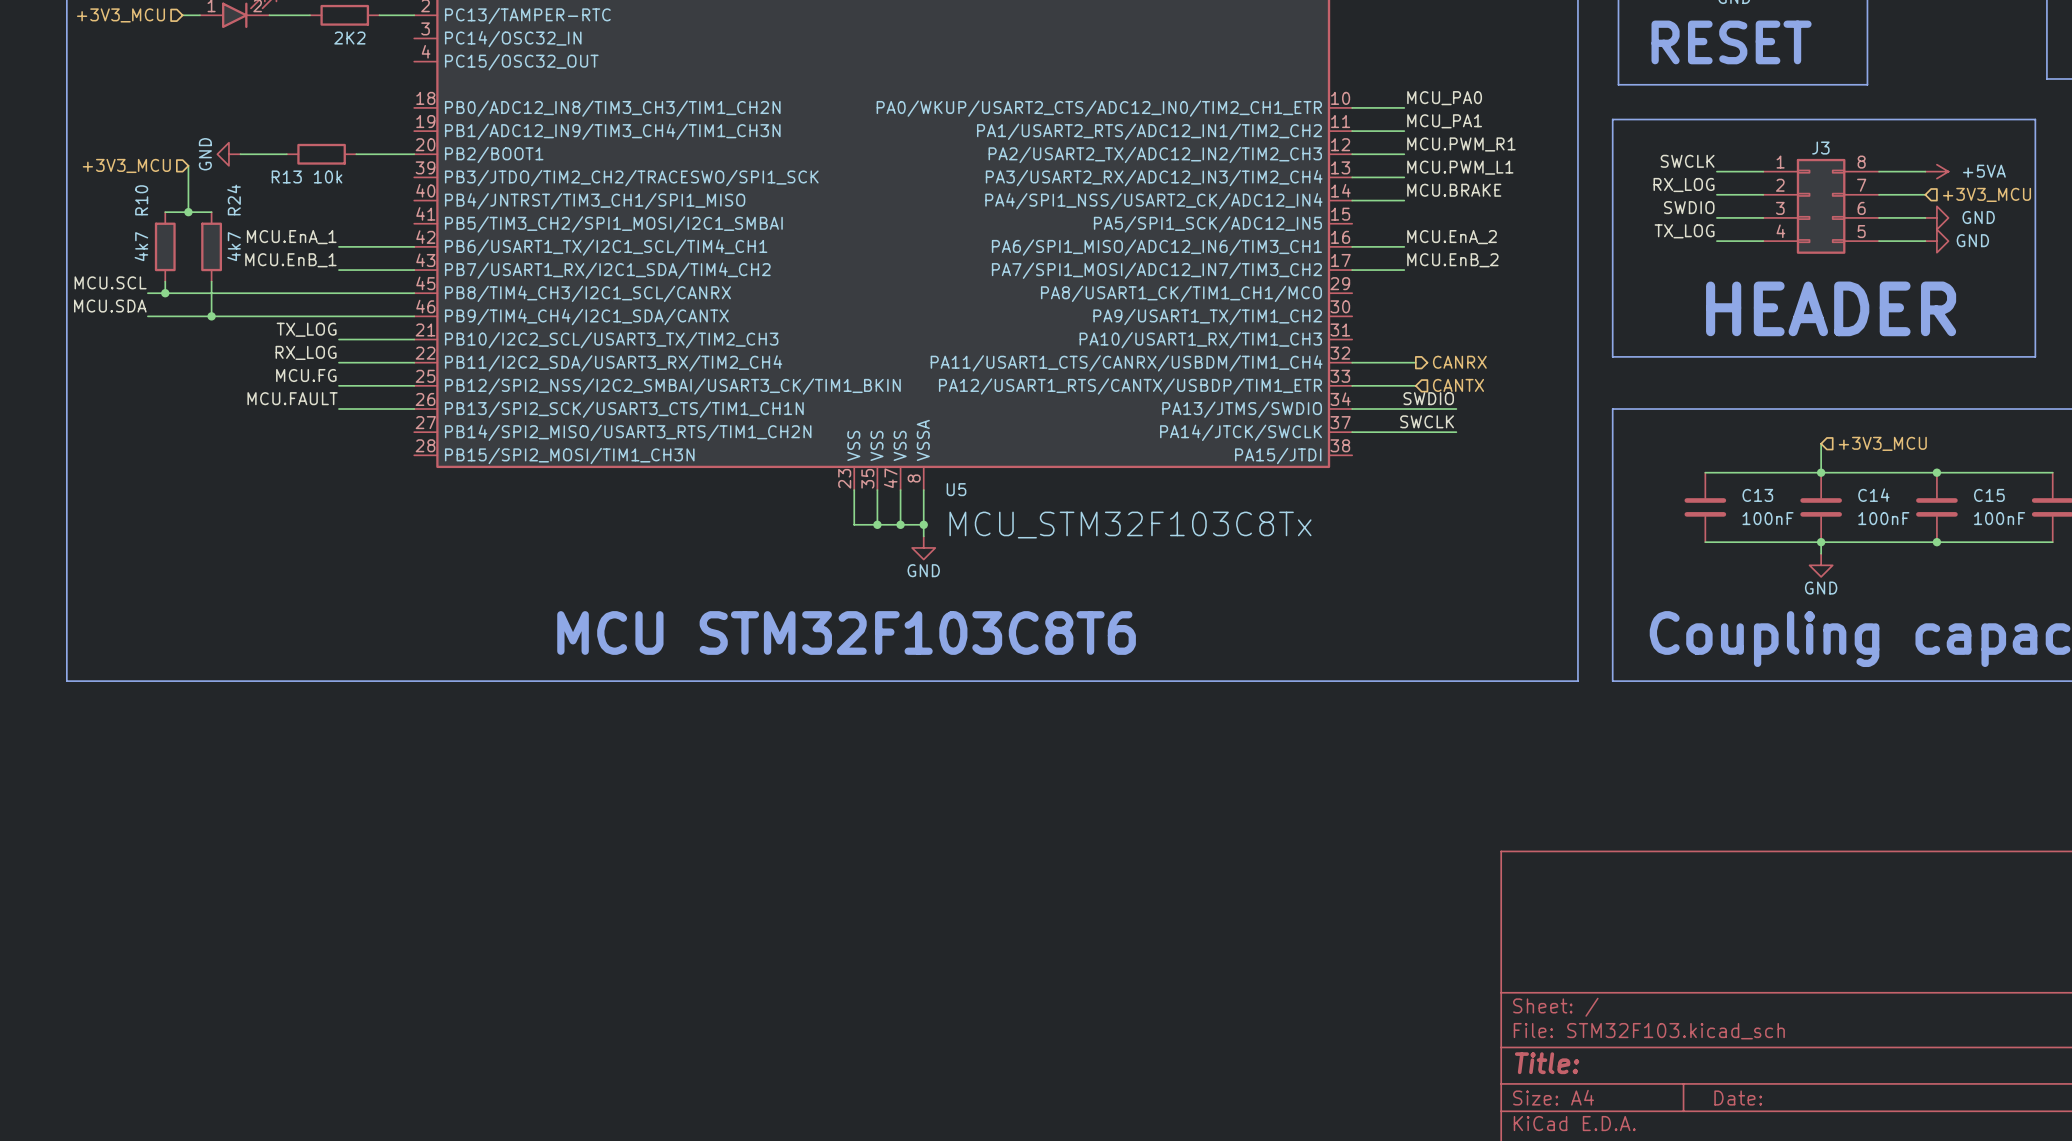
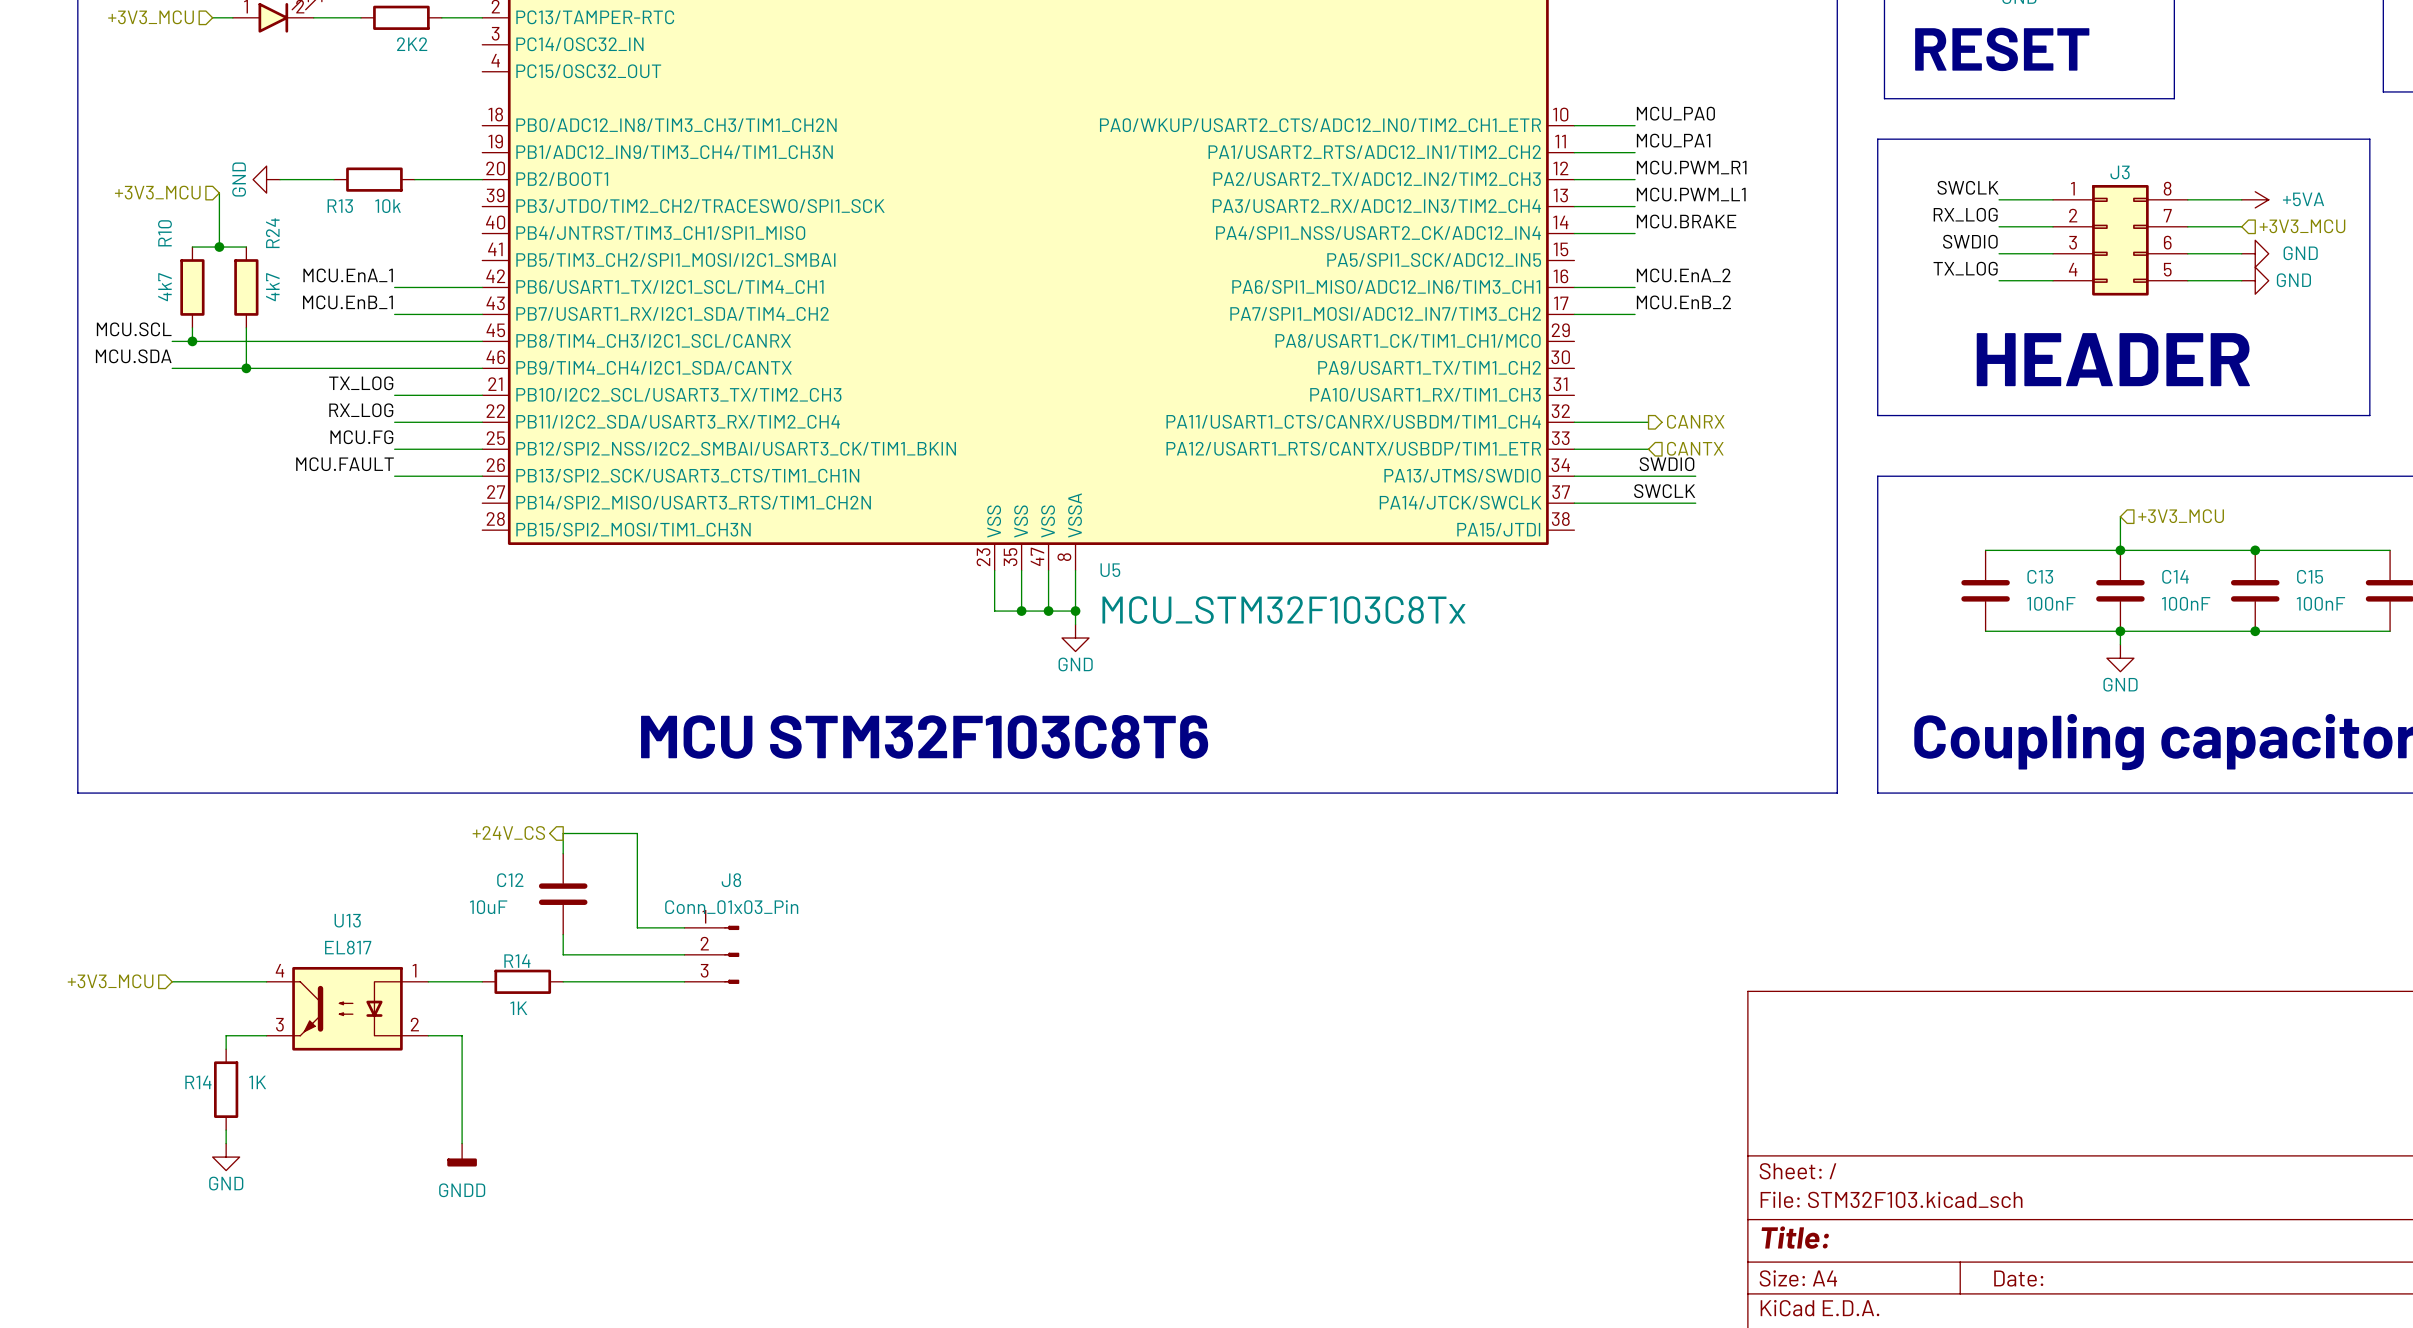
hierarchical label: none -> +24V_CS (508, 833)
wire: none -> (563, 853) (563, 833) (637, 833) (637, 927) (684, 927)
C12: none -> 10uF (563, 894)
wire: none -> (563, 934) (563, 954) (684, 954)
J8: none -> Conn_01x03_Pin (711, 954)
hierarchical label: none -> +3V3_MCU (110, 981)
wire: none -> (172, 981) (266, 981)
wire: none -> (428, 981) (482, 981)
R14: none -> 1K (522, 981)
wire: none -> (563, 981) (684, 981)
U13: none -> EL817 (347, 1008)
wire: none -> (266, 1035) (226, 1035) (226, 1049)
wire: none -> (428, 1035) (462, 1035) (462, 1143)
R14: none -> 1K (226, 1089)
wire: none -> (226, 1130) (226, 1143)
power symbol: none -> GNDD (462, 1155)
power symbol: none -> GND (226, 1157)

